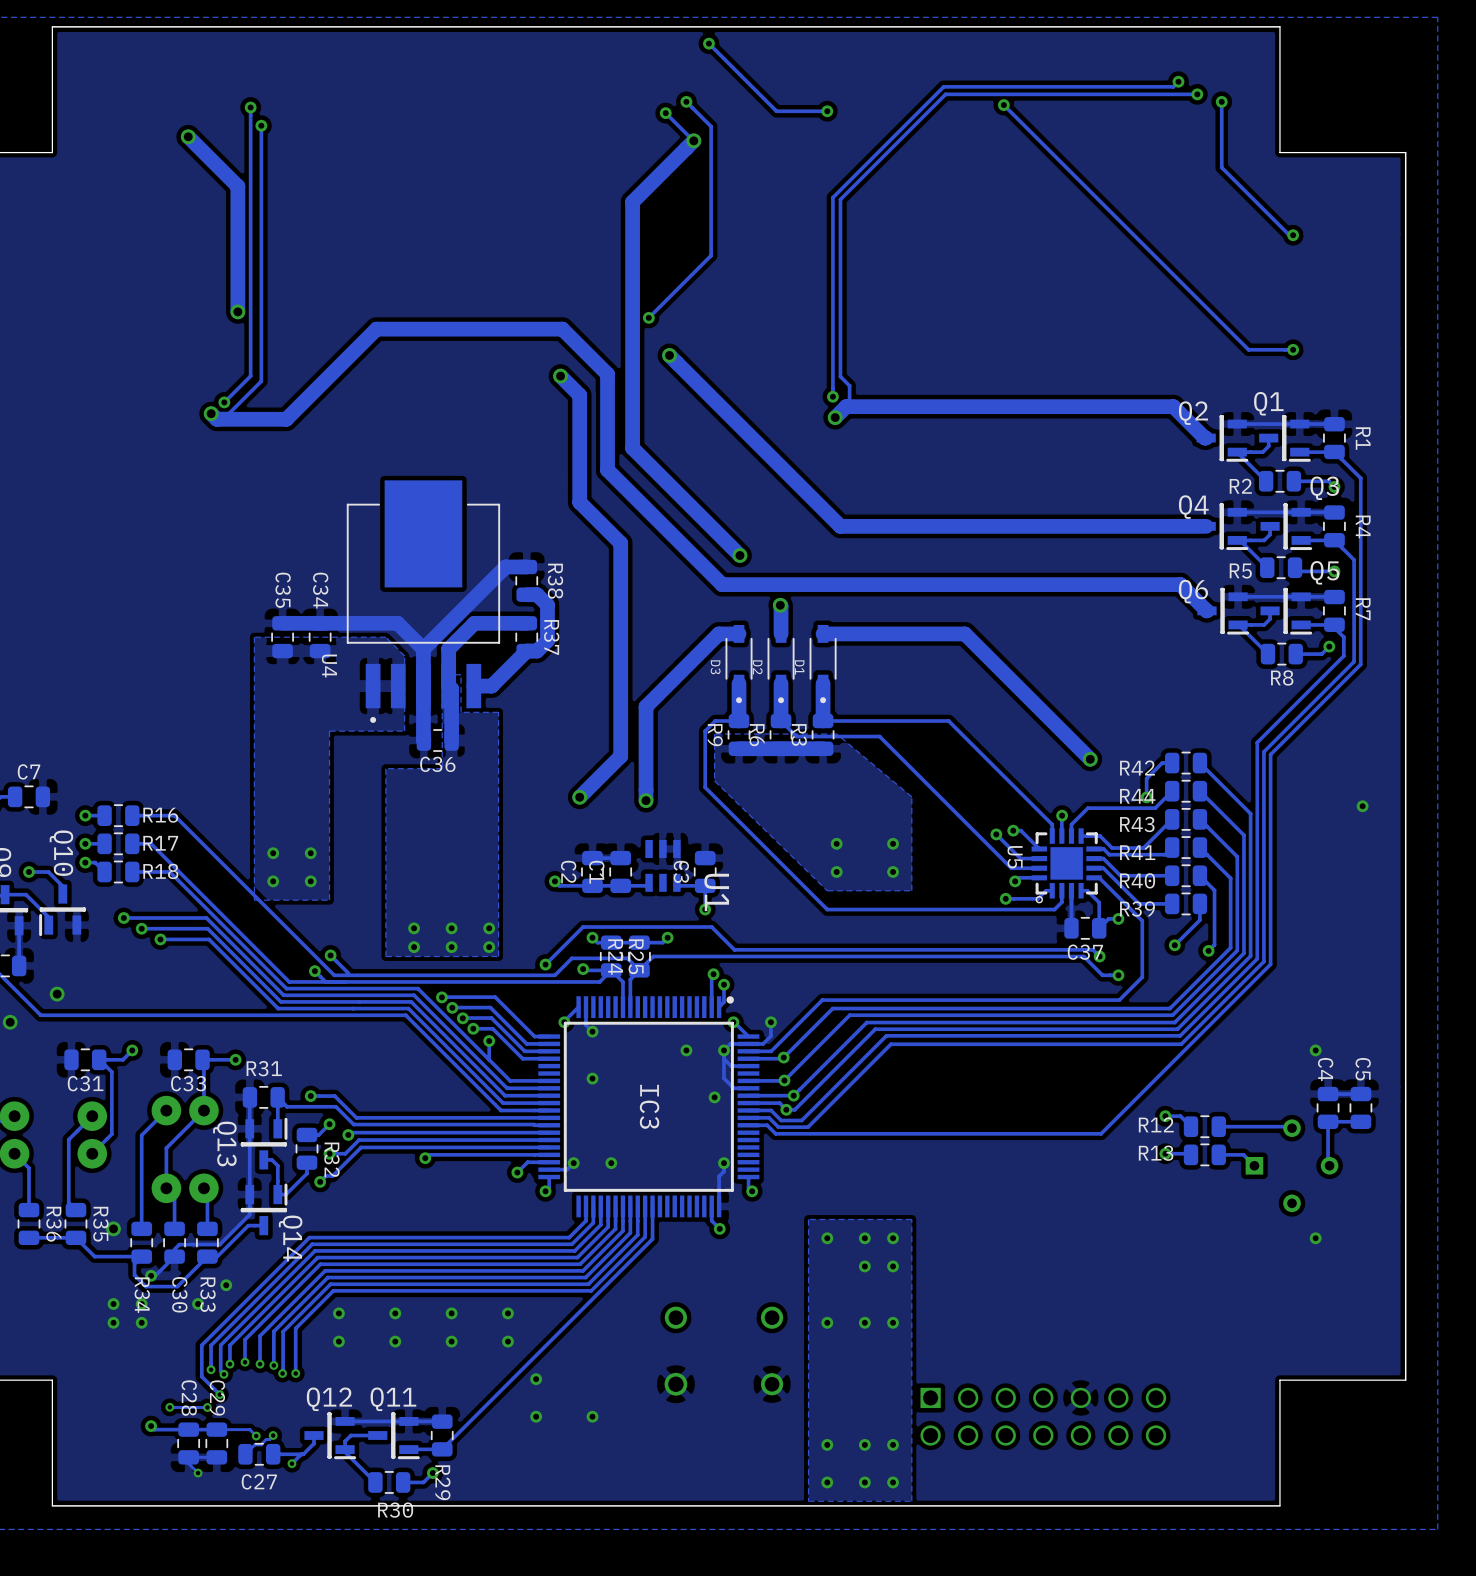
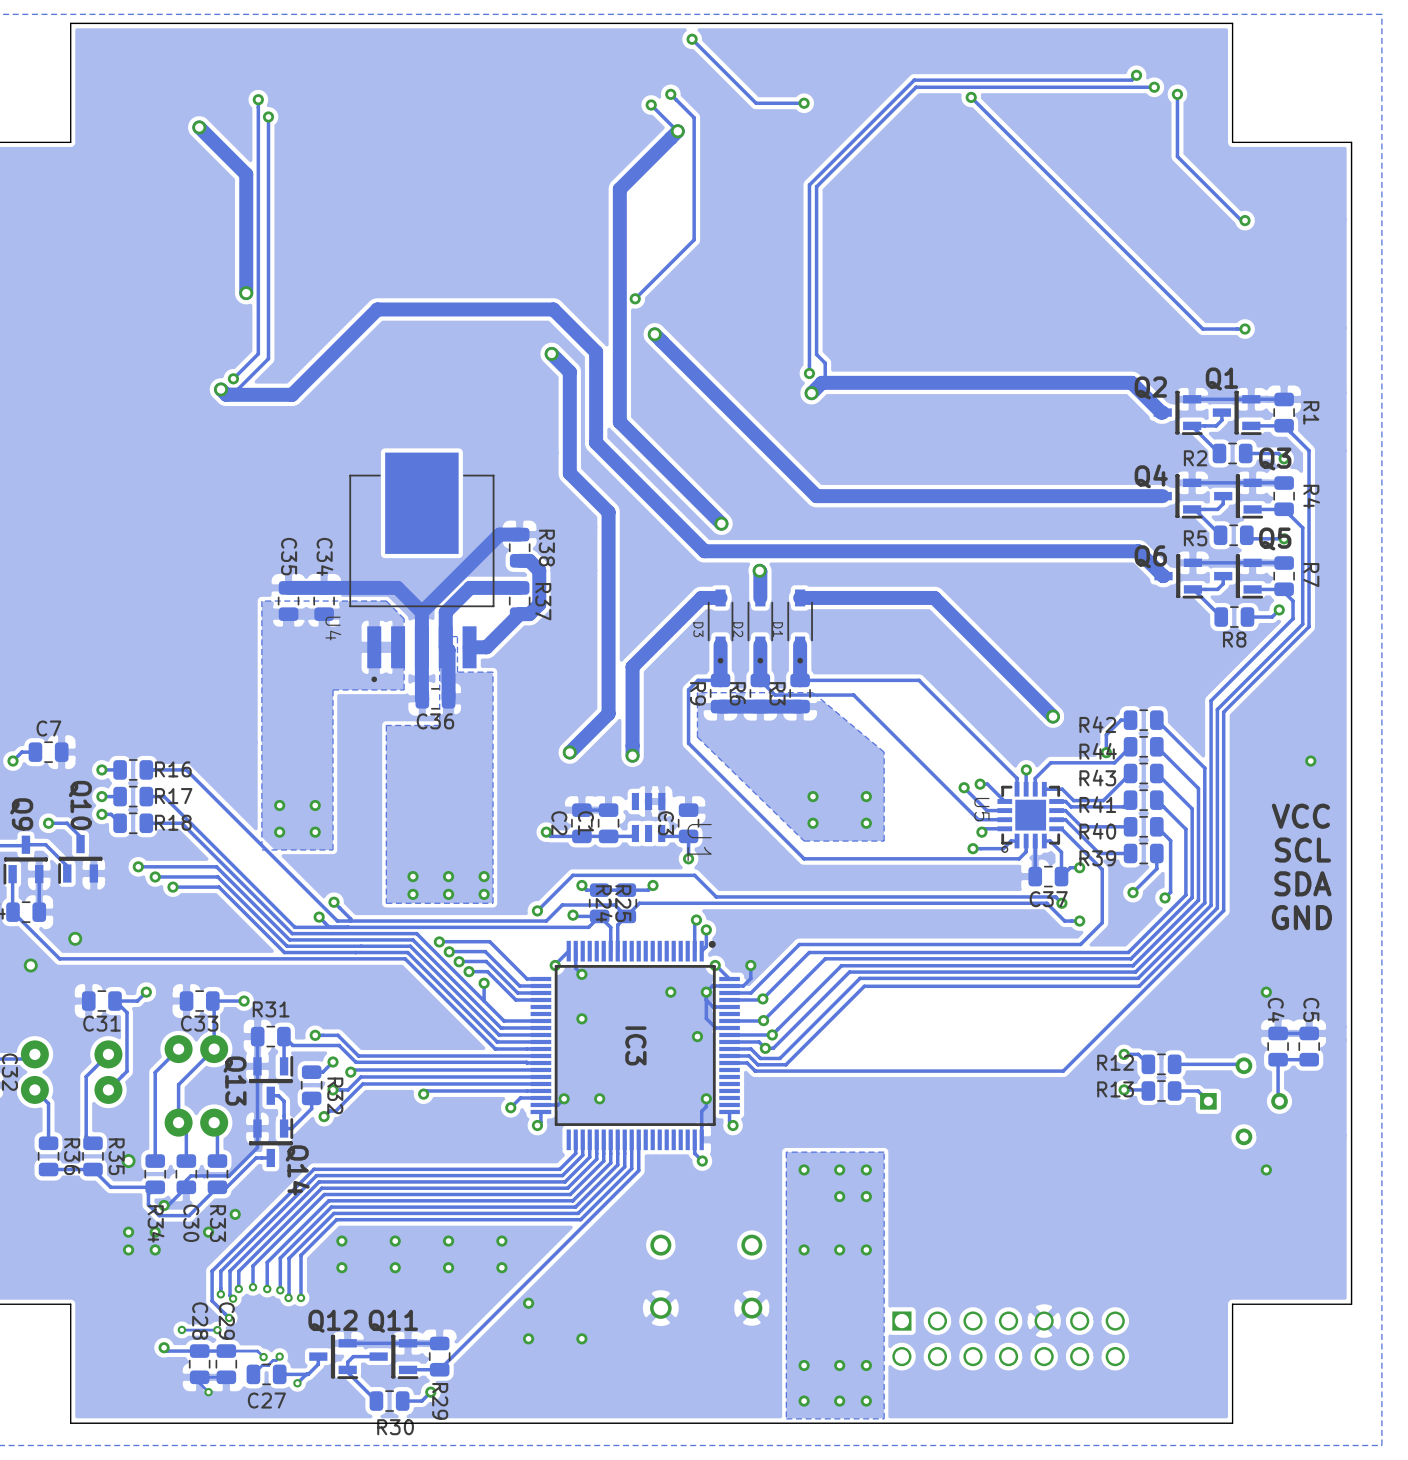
text: none -> VCC (1300, 816)
text: none -> SCL (1302, 850)
text: none -> SDA (1302, 883)
text: none -> GND (1301, 917)

